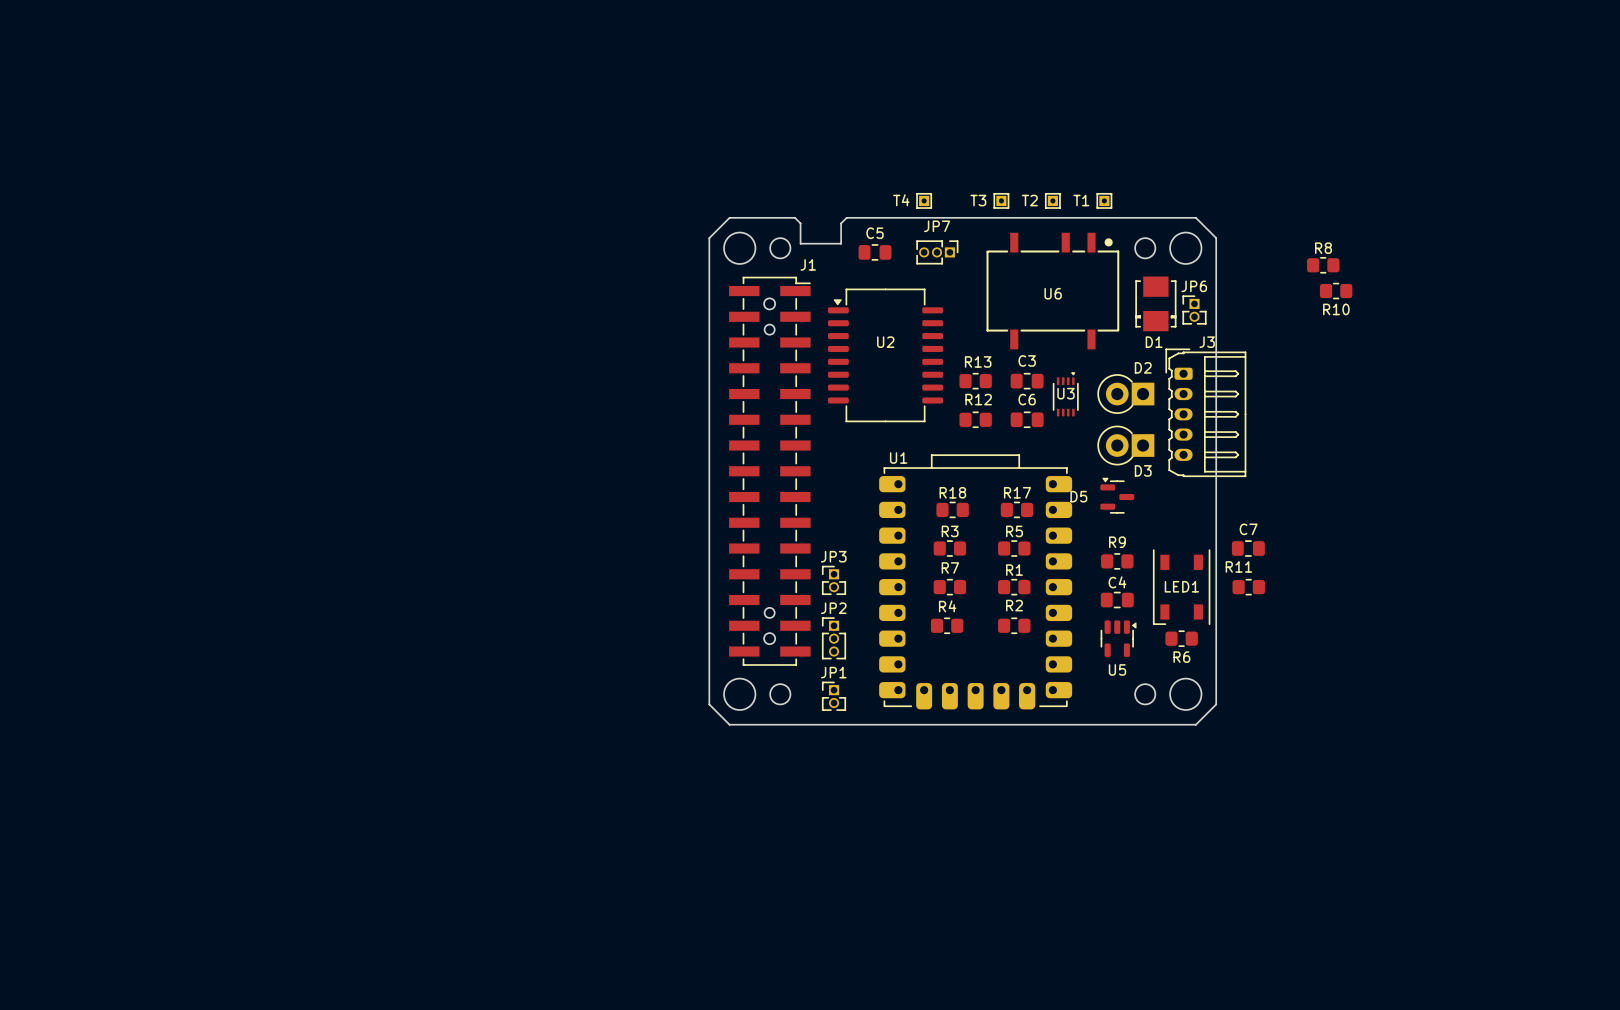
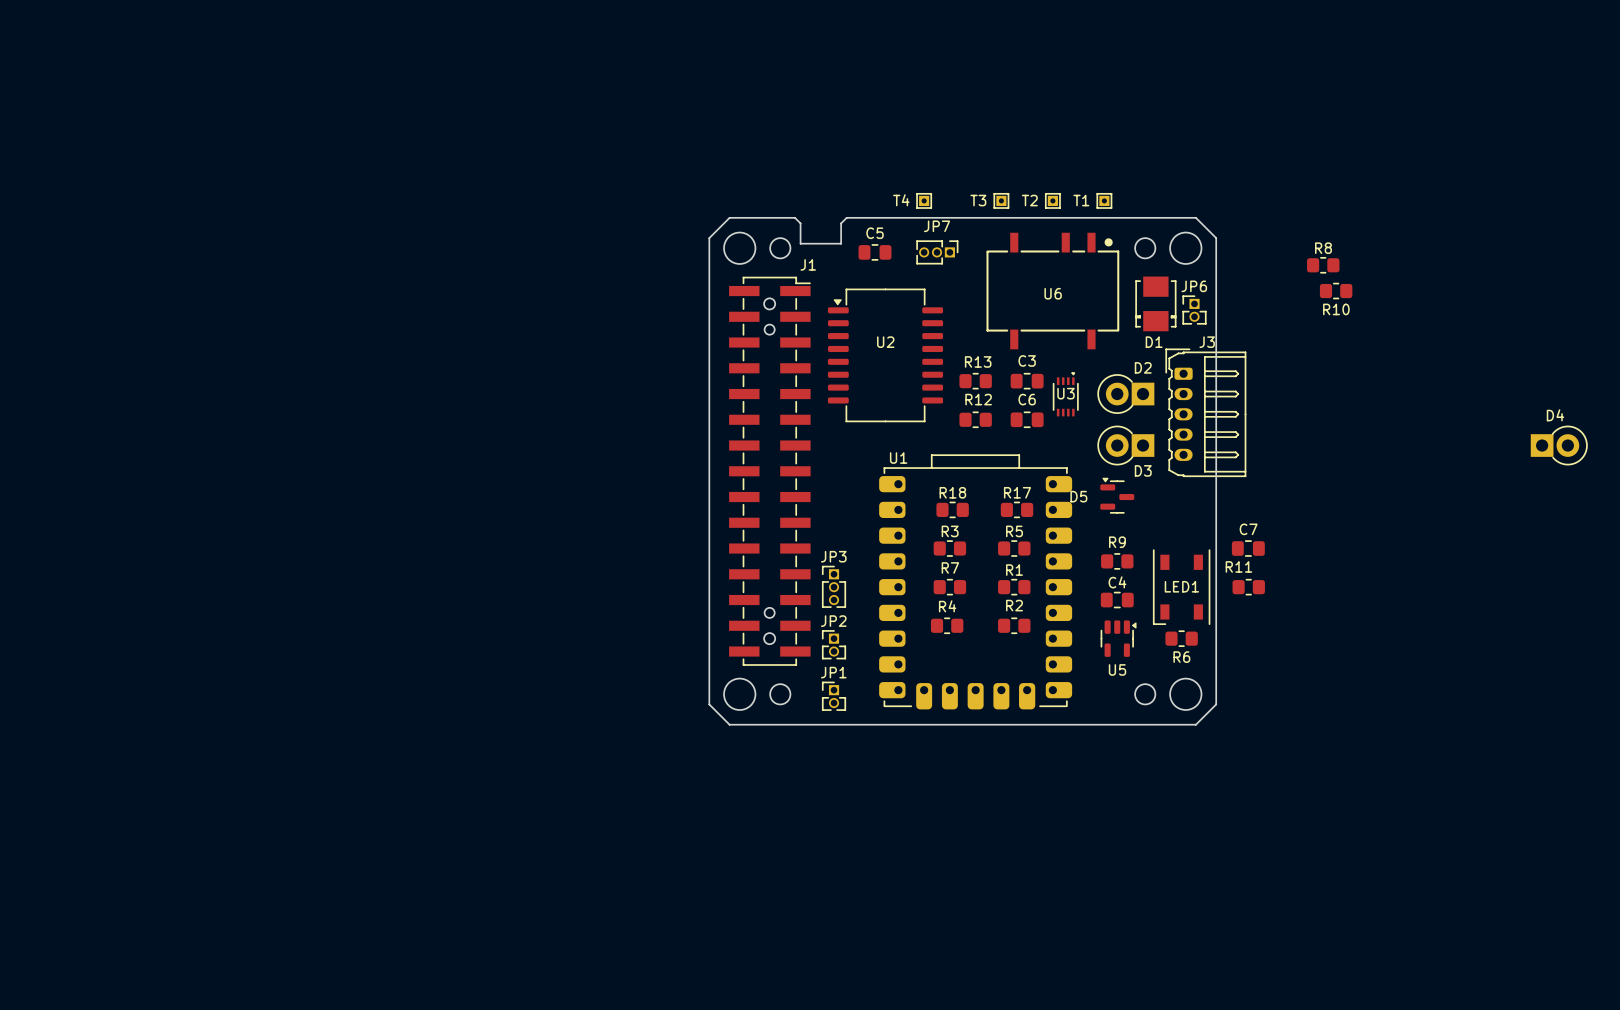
D4: none -> (1559, 445)
JP3 footprint: [822, 565, 846, 595] -> [822, 565, 846, 608]
JP2 footprint: [822, 617, 846, 660] -> [822, 630, 846, 660]

